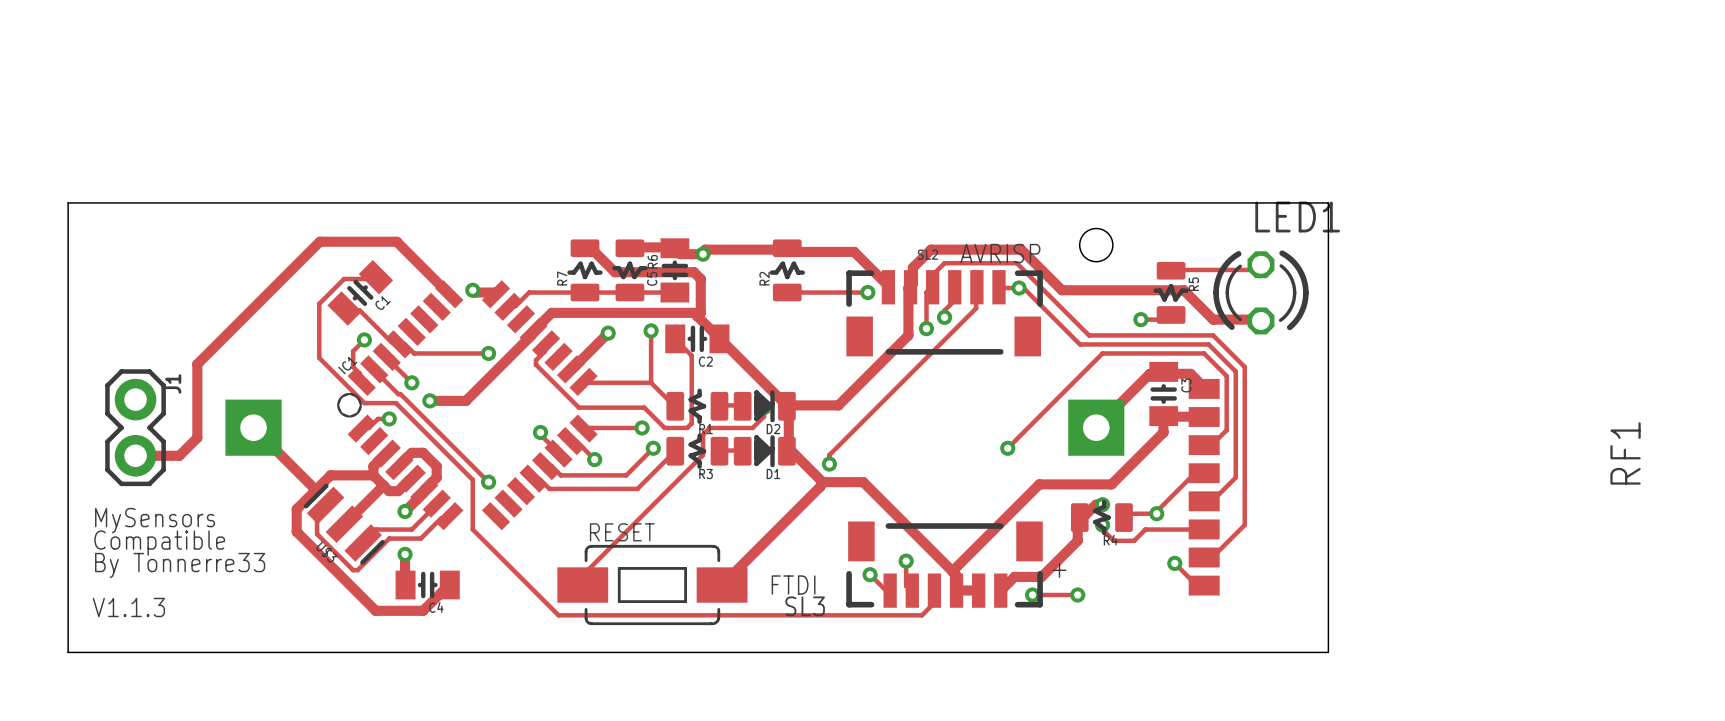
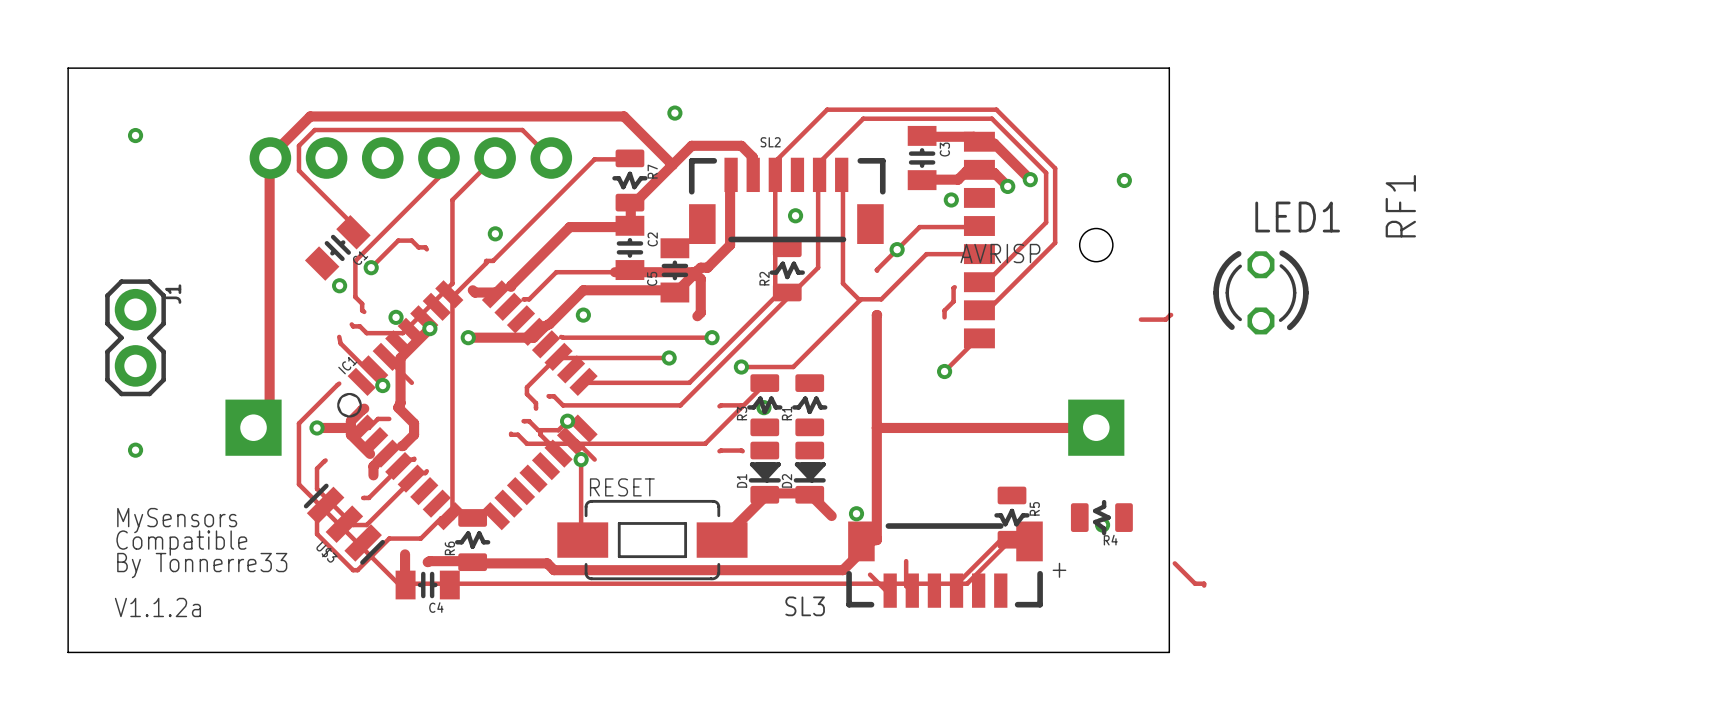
via: none -> (674, 113)
via: none -> (135, 135)
track: none -> (922, 135) (973, 136) (982, 143) (994, 143) (1030, 179)
part: none -> (410, 158)
track: none -> (438, 158) (438, 177) (355, 260) (355, 297) (362, 303) (362, 310) (364, 311)
track: none -> (495, 158) (452, 199) (452, 283) (402, 333) (366, 333) (359, 326) (353, 326) (351, 324)
track: none -> (551, 158) (522, 130) (314, 130) (298, 145) (298, 170) (353, 224) (353, 232)
track: none -> (629, 158) (594, 159) (493, 260) (486, 260) (486, 263) (452, 297) (452, 518)
track: none -> (731, 174) (730, 245) (707, 267) (700, 267) (678, 290) (583, 290) (533, 337) (468, 337)
track: none -> (753, 174) (752, 157) (741, 145) (691, 145) (635, 202) (629, 202) (630, 222) (628, 227) (569, 227) (511, 286)
track: none -> (775, 174) (777, 172) (777, 159) (827, 109) (996, 109) (1055, 168) (1055, 242) (989, 308) (980, 308) (979, 310)
track: none -> (841, 174) (842, 283) (859, 300)
track: none -> (775, 175) (775, 297) (689, 382) (651, 382)
via: none -> (1030, 179)
track: none -> (922, 180) (958, 179) (967, 170) (979, 169) (982, 172) (994, 172) (1007, 186)
via: none -> (1124, 180)
via: none -> (1007, 186)
via: none -> (951, 199)
board edge: (68, 202) (1328, 202) (1328, 652) (1169, 652) -> (68, 202) (68, 68) (1169, 68) (1169, 652)
via: none -> (795, 215)
track: none -> (979, 226) (919, 227) (877, 270)
via: none -> (495, 233)
track: (585, 248) (592, 249) (614, 272) -> (523, 299) (529, 299) (556, 272) (614, 272)
track: (629, 248) (671, 247) (680, 254) (703, 254) (705, 249) (787, 248) (791, 251) (854, 251) (888, 287) -> none
track: none -> (426, 249) (425, 247) (418, 247) (411, 240) (398, 240) (371, 267)
via: none -> (897, 249)
via: (703, 254) -> none
track: (926, 254) (931, 249) (1021, 249) (1061, 290) (1183, 290) (1213, 319) (1260, 320) -> (926, 254) (979, 254)
track width: thick (926, 254) (912, 267) -> thin (926, 254) (912, 267)
track: (1260, 264) (1256, 269) (1171, 270) -> none
via: none -> (371, 267)
track: (912, 267) (912, 283) (908, 288) (908, 335) (838, 405) (786, 406) -> (912, 267) (881, 299) (861, 299) (793, 367) (741, 367)
R7 rotation: 0° (585, 270) -> 180° (629, 180)
R7 position: (585, 270) -> (629, 180)
R6 rotation: 0° (629, 270) -> 180° (472, 540)
R6 position: (629, 270) -> (472, 540)
track: (375, 277) (375, 278) (344, 278) (319, 303) (319, 357) (364, 403) (396, 403) (472, 479) (472, 529) (558, 615) (921, 615) (933, 604) (934, 590) -> none
track: none -> (979, 282) (987, 281) (1046, 222) (1046, 172) (991, 118) (863, 118) (820, 161) (820, 172) (818, 175) (818, 267) (680, 405) (563, 405) (554, 396) (548, 396)
via: none -> (339, 285)
track: (976, 287) (976, 308) (829, 455) (829, 464) -> none
track: (998, 287) (1023, 288) (1079, 344) (1208, 344) (1235, 371) (1235, 477) (1213, 500) (1204, 501) -> none
via: (1019, 288) -> none
via: (472, 290) -> none
C1 position: (360, 292) -> (337, 247)
track: (674, 292) (529, 292) (515, 306) (508, 306) -> none
track: (787, 292) (867, 292) -> none
via: (867, 292) -> none
R5 position: (1171, 292) -> (1012, 517)
track: (449, 294) (396, 241) (319, 241) (197, 364) (197, 437) (179, 455) (135, 455) -> none
track: (344, 308) (346, 310) (359, 310) (391, 342) (405, 344) (414, 353) (488, 353) -> none
SL2 position: (944, 313) -> (787, 200)
track: none -> (876, 315) (876, 540) (872, 540) (842, 570) (554, 570) (547, 563) (427, 562)
via: none -> (396, 317)
via: (944, 317) -> none
via: (1140, 319) -> none
track: none -> (429, 328) (400, 357) (400, 403) (398, 407) (414, 423) (414, 434) (401, 446)
via: none -> (429, 328)
track: (926, 328) (926, 292) (933, 285) (933, 274) (944, 263) (1016, 263) (1089, 335) (1213, 335) (1244, 367) (1244, 525) (1213, 556) (1204, 557) -> none
via: (926, 328) -> none
track: (651, 330) (651, 382) (675, 406) -> none
via: (651, 330) -> none
track: (608, 333) (571, 369) -> none
via position: (608, 333) -> (583, 315)
track: none -> (339, 336) (340, 343) (382, 385)
track: none -> (561, 336) (712, 337)
via: none -> (468, 337)
via: none -> (712, 337)
track: (675, 338) (691, 355) (691, 423) (687, 427) (664, 427) (644, 407) (578, 407) (535, 364) (535, 360) (545, 351) (546, 344) -> none
C2 rotation: 0° (697, 338) -> 90° clockwise (629, 247)
C2 position: (697, 338) -> (629, 247)
track: none -> (979, 338) (944, 371)
track: (364, 339) (353, 351) (353, 367) (359, 373) (361, 381) -> none
via: (364, 339) -> none
via: (488, 353) -> none
track: none -> (669, 357) (556, 357) (526, 387) (526, 394) (535, 403) (536, 408)
via: none -> (669, 357)
via: none -> (741, 367)
track: (374, 369) (488, 482) -> none
via: none -> (944, 371)
via: (411, 382) -> none
track: none -> (339, 383) (298, 423) (298, 484) (398, 583) (967, 583) (1010, 540)
track: none -> (764, 383) (705, 443) (526, 443) (517, 434) (511, 433)
via: none -> (382, 385)
track: (1204, 388) (1190, 373) (1165, 373) (1163, 371) (1149, 373) (1096, 427) -> (876, 427) (1096, 427)
C3 position: (1163, 393) -> (922, 158)
track: (429, 400) (466, 400) (551, 312) (693, 312) (786, 406) -> none
via: (429, 400) -> none
R1 rotation: 0° (697, 406) -> 90° clockwise (809, 405)
R1 position: (697, 406) -> (809, 405)
D2 rotation: 0° (764, 406) -> 90° clockwise (809, 472)
D2 position: (764, 406) -> (809, 472)
track: (786, 406) (788, 407) (788, 450) (786, 451) (793, 452) (822, 482) -> none
track: (763, 407) (763, 416) (752, 427) (709, 427) (703, 434) (703, 455) (583, 574) (582, 585) -> none
track: none -> (364, 408) (350, 421) (350, 434) (370, 453)
track: (1204, 416) (1163, 416) (1163, 432) (1111, 484) (1039, 484) (952, 571) -> none
via: (389, 418) -> none
track: none -> (523, 421) (529, 421) (538, 430) (558, 430) (567, 421)
via: none -> (567, 421)
J1 position: (135, 427) -> (135, 337)
track: (253, 427) (315, 490) -> (253, 427) (269, 409) (269, 159) (310, 116) (624, 116) (672, 164)
track: none -> (317, 427) (350, 427)
via: none -> (317, 427)
track: (642, 427) (583, 428) -> none
via: (642, 427) -> none
via: (540, 432) -> none
track: (1204, 445) (1213, 443) (1226, 430) (1226, 376) (1204, 353) (1102, 353) (1007, 448) -> none
track: (653, 448) (626, 475) (560, 475) (551, 466) (546, 466) -> none
via: (653, 448) -> none
via: (1007, 448) -> none
via: none -> (135, 450)
track: (675, 451) (637, 488) (549, 488) (540, 479) (533, 478) -> none
R3 rotation: 0° (697, 451) -> 90° clockwise (764, 405)
R3 position: (697, 451) -> (764, 405)
D1 rotation: 0° (764, 451) -> 90° clockwise (764, 472)
track: none -> (414, 458) (407, 459) (368, 497) (363, 497)
track: none -> (581, 459) (581, 538) (582, 540)
via position: (594, 459) -> (581, 459)
track: none -> (325, 460) (317, 468) (317, 488) (353, 525) (366, 525) (418, 473) (425, 473) (426, 471)
via: (829, 464) -> none
track: (399, 466) (411, 452) (423, 452) (436, 466) (436, 477) (405, 511) -> none
track: (1204, 473) (1204, 475) (1192, 475) (1154, 513) -> none
track: (411, 478) (398, 491) (389, 491) (373, 475) (330, 475) (296, 509) (296, 531) (375, 610) (423, 610) (449, 585) -> none
via: (488, 482) -> none
track: (822, 482) (863, 482) (955, 574) (956, 590) (978, 590) -> none
track: (822, 482) (820, 486) (722, 585) -> none
track: (383, 485) (344, 524) -> none
RF1 position: (1204, 487) -> (979, 240)
track: (436, 503) (411, 529) (375, 529) (363, 542) -> none
track: (1102, 504) (1095, 504) (1084, 516) (1077, 518) (1077, 540) (1041, 576) (1014, 576) (1000, 590) -> none
via: (1102, 504) -> none
via: (405, 511) -> none
via: none -> (856, 513)
track: (1156, 513) (1127, 513) (1124, 517) -> none
via: (1156, 513) -> none
track: none -> (831, 516) (809, 493) (766, 493) (722, 540)
text position: MySensors (155, 520) -> MySensors (177, 520)
track: (1102, 525) (1102, 529) (1113, 540) (1134, 540) (1145, 529) (1204, 529) -> none
track: none -> (1012, 539) (1000, 540) (958, 583)
text position: Compatible (159, 543) -> Compatible (181, 543)
via: (405, 554) -> none
via: (906, 561) -> none
via: (1174, 563) -> none
text position: By Tonnerre33 (180, 565) -> By Tonnerre33 (202, 565)
via: (870, 574) -> none
RESET position: (652, 585) -> (652, 540)
text: FTDI (793, 585) -> none
track: (1032, 595) (1077, 595) -> none
via: (1032, 595) -> none
via: (1077, 595) -> none
text: V1.1.3 (128, 607) -> V1.1.2a (157, 607)

